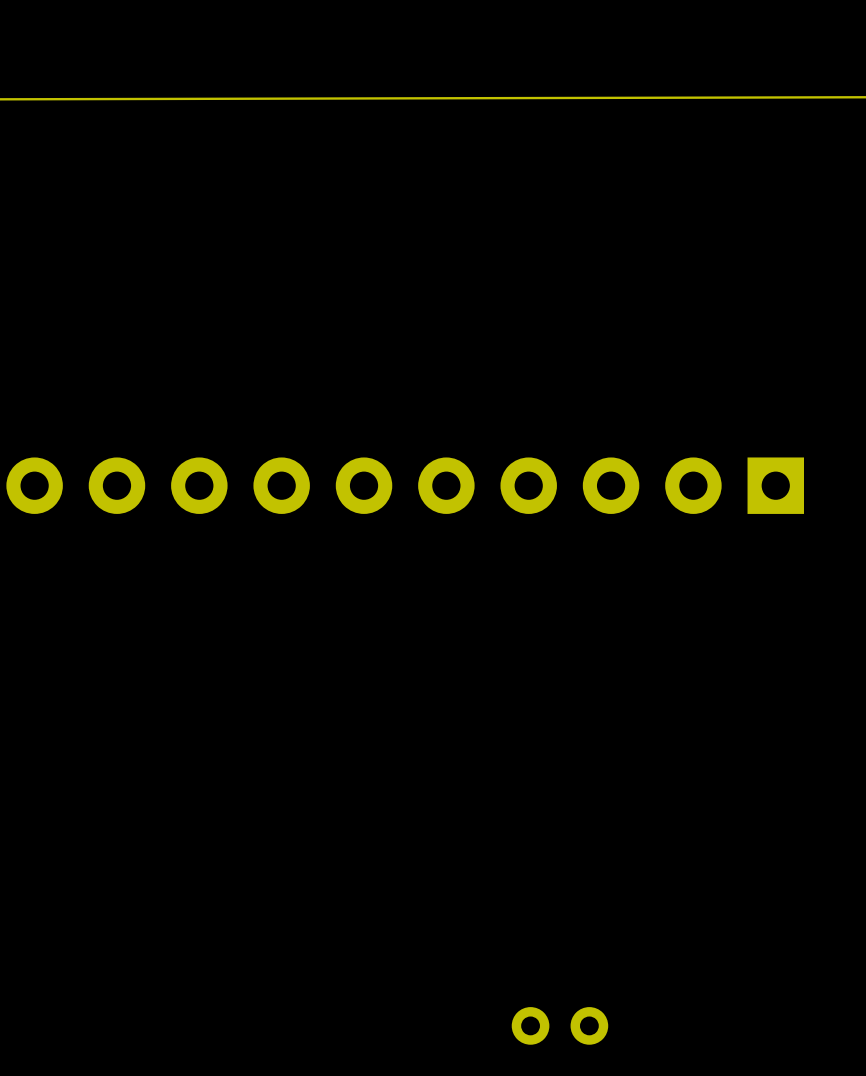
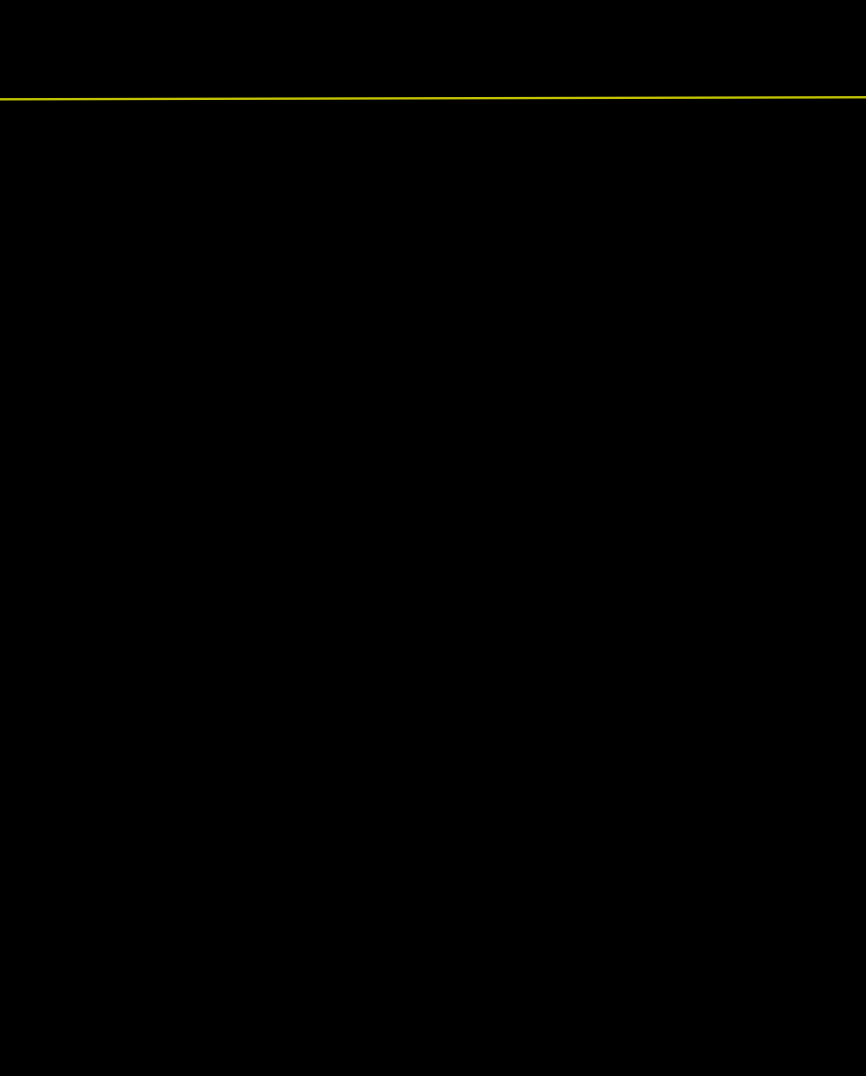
part: (405, 485) -> none
part: (559, 1025) -> none

